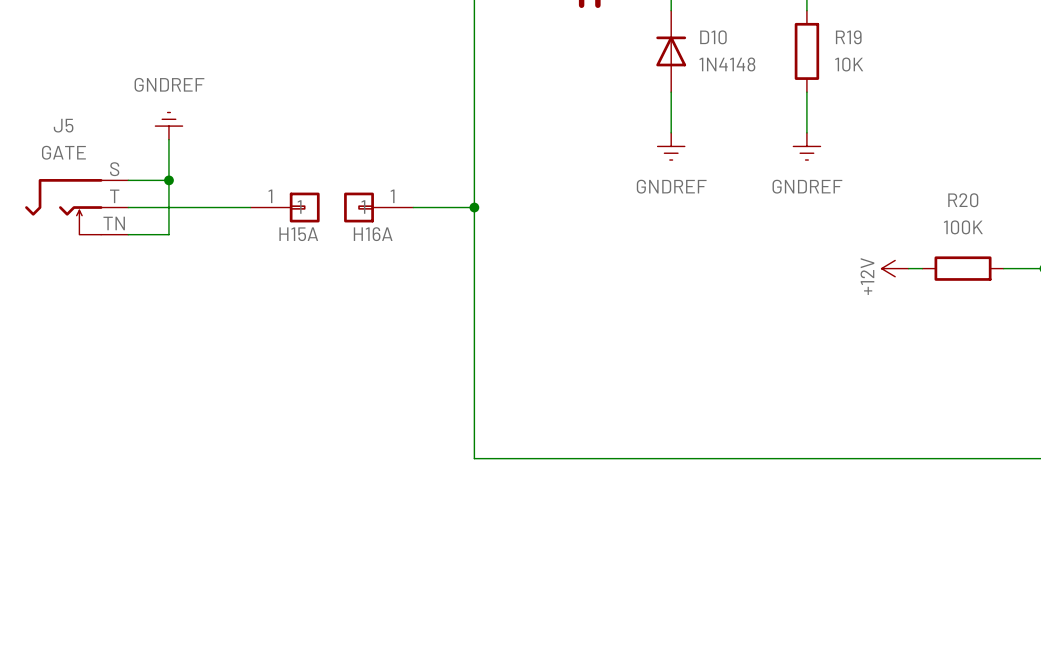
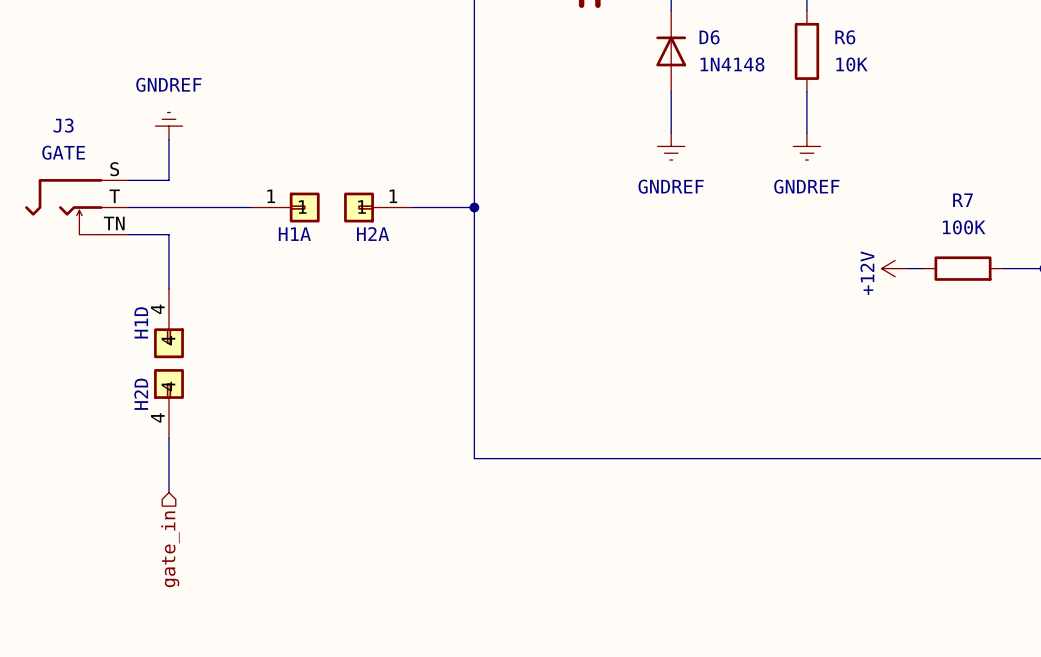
D10 name: D10 (713, 37) -> D6 (709, 37)
R19 name: R19 (848, 37) -> R6 (845, 37)
J5 name: J5 (63, 125) -> J3 (63, 125)
wire: (168, 180) (168, 234) -> (168, 288) (168, 234)
junction: (168, 180) -> none
R20 name: R20 (963, 200) -> R7 (962, 200)
H15A name: H15A (298, 234) -> H1A (294, 234)
H16A name: H16A (373, 234) -> H2A (373, 234)
H1D: none -> (168, 323)
H2D: none -> (168, 403)
wire: none -> (168, 438) (168, 492)
hierarchical label: none -> gate_in (170, 549)

